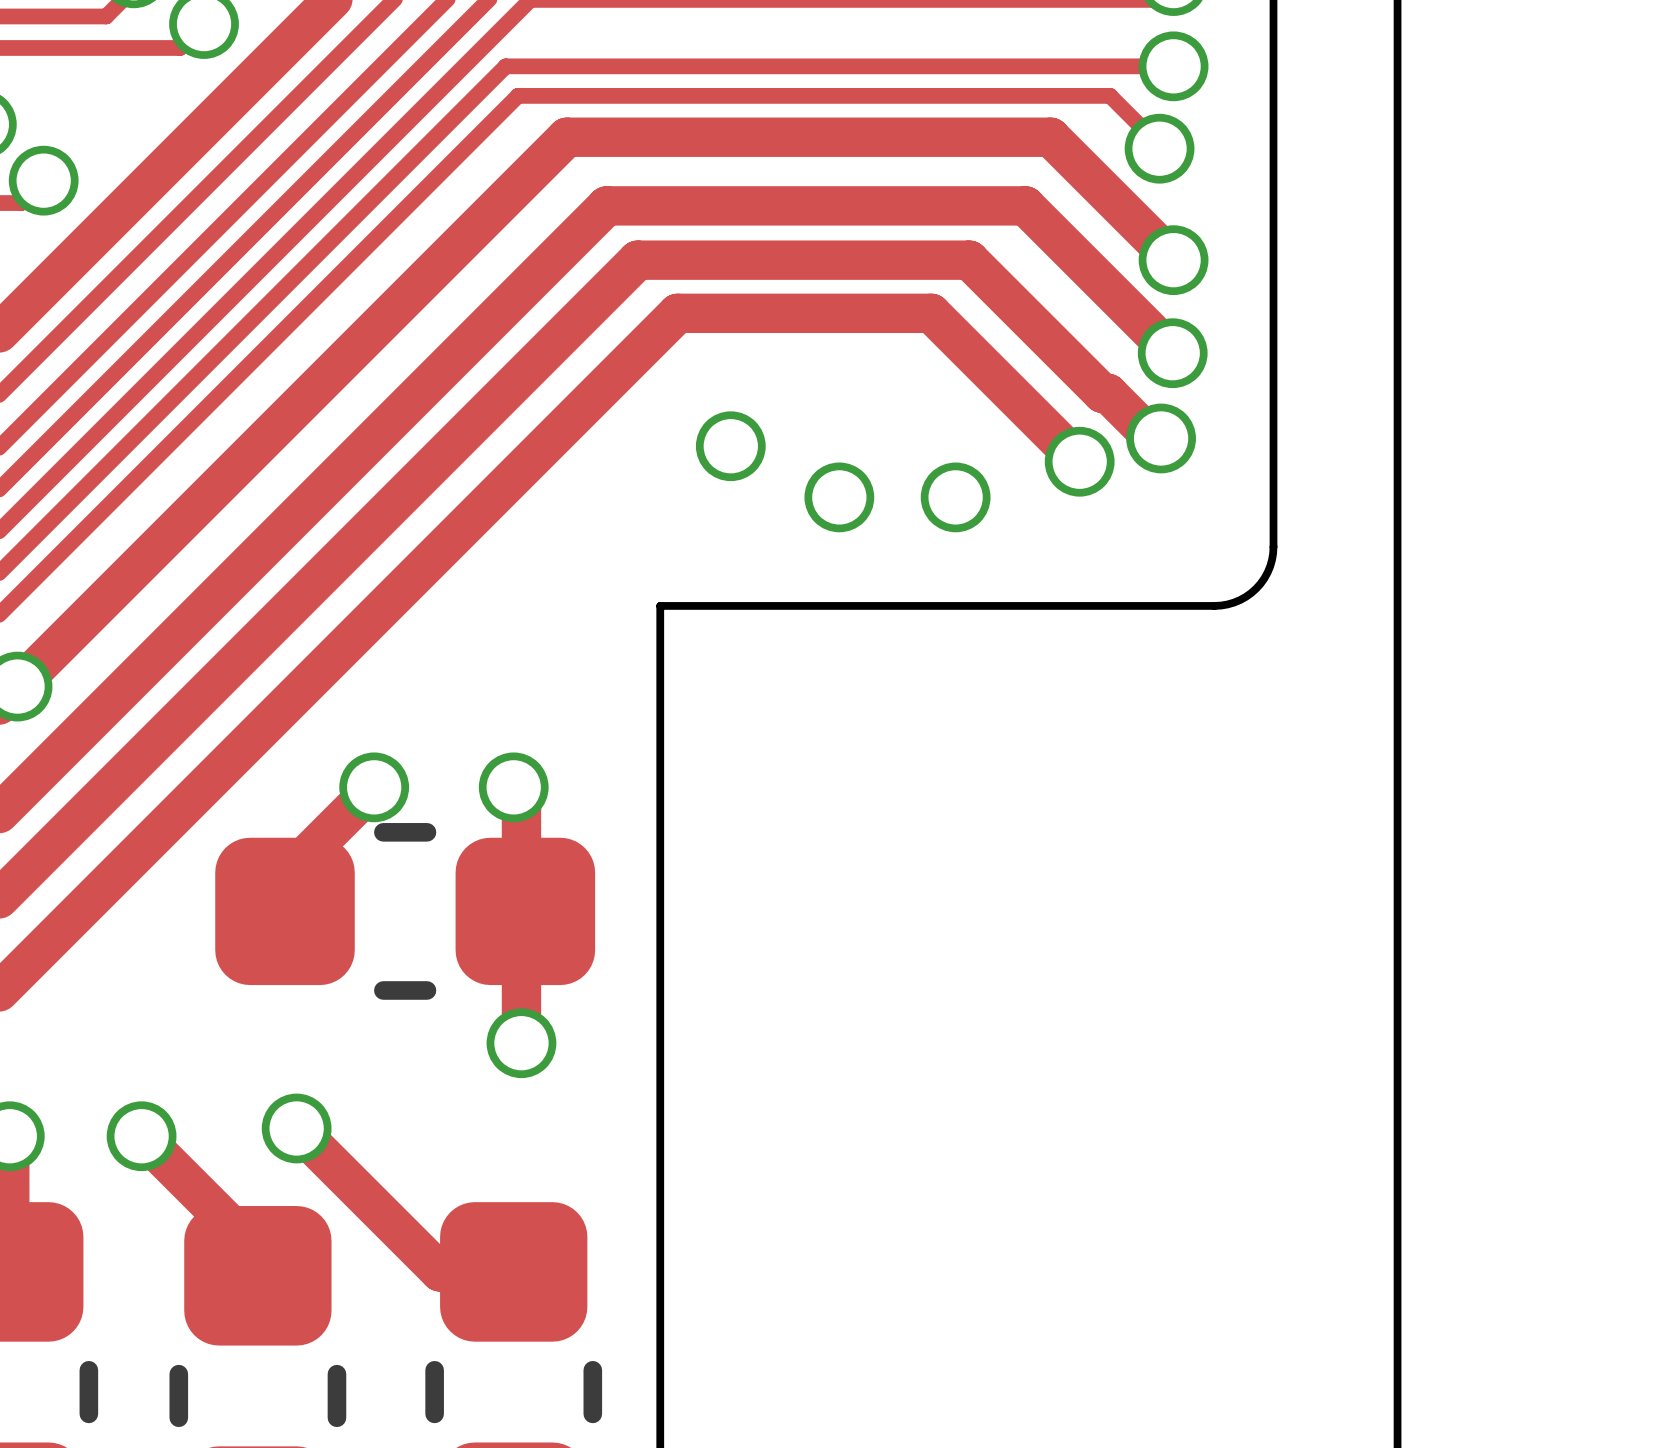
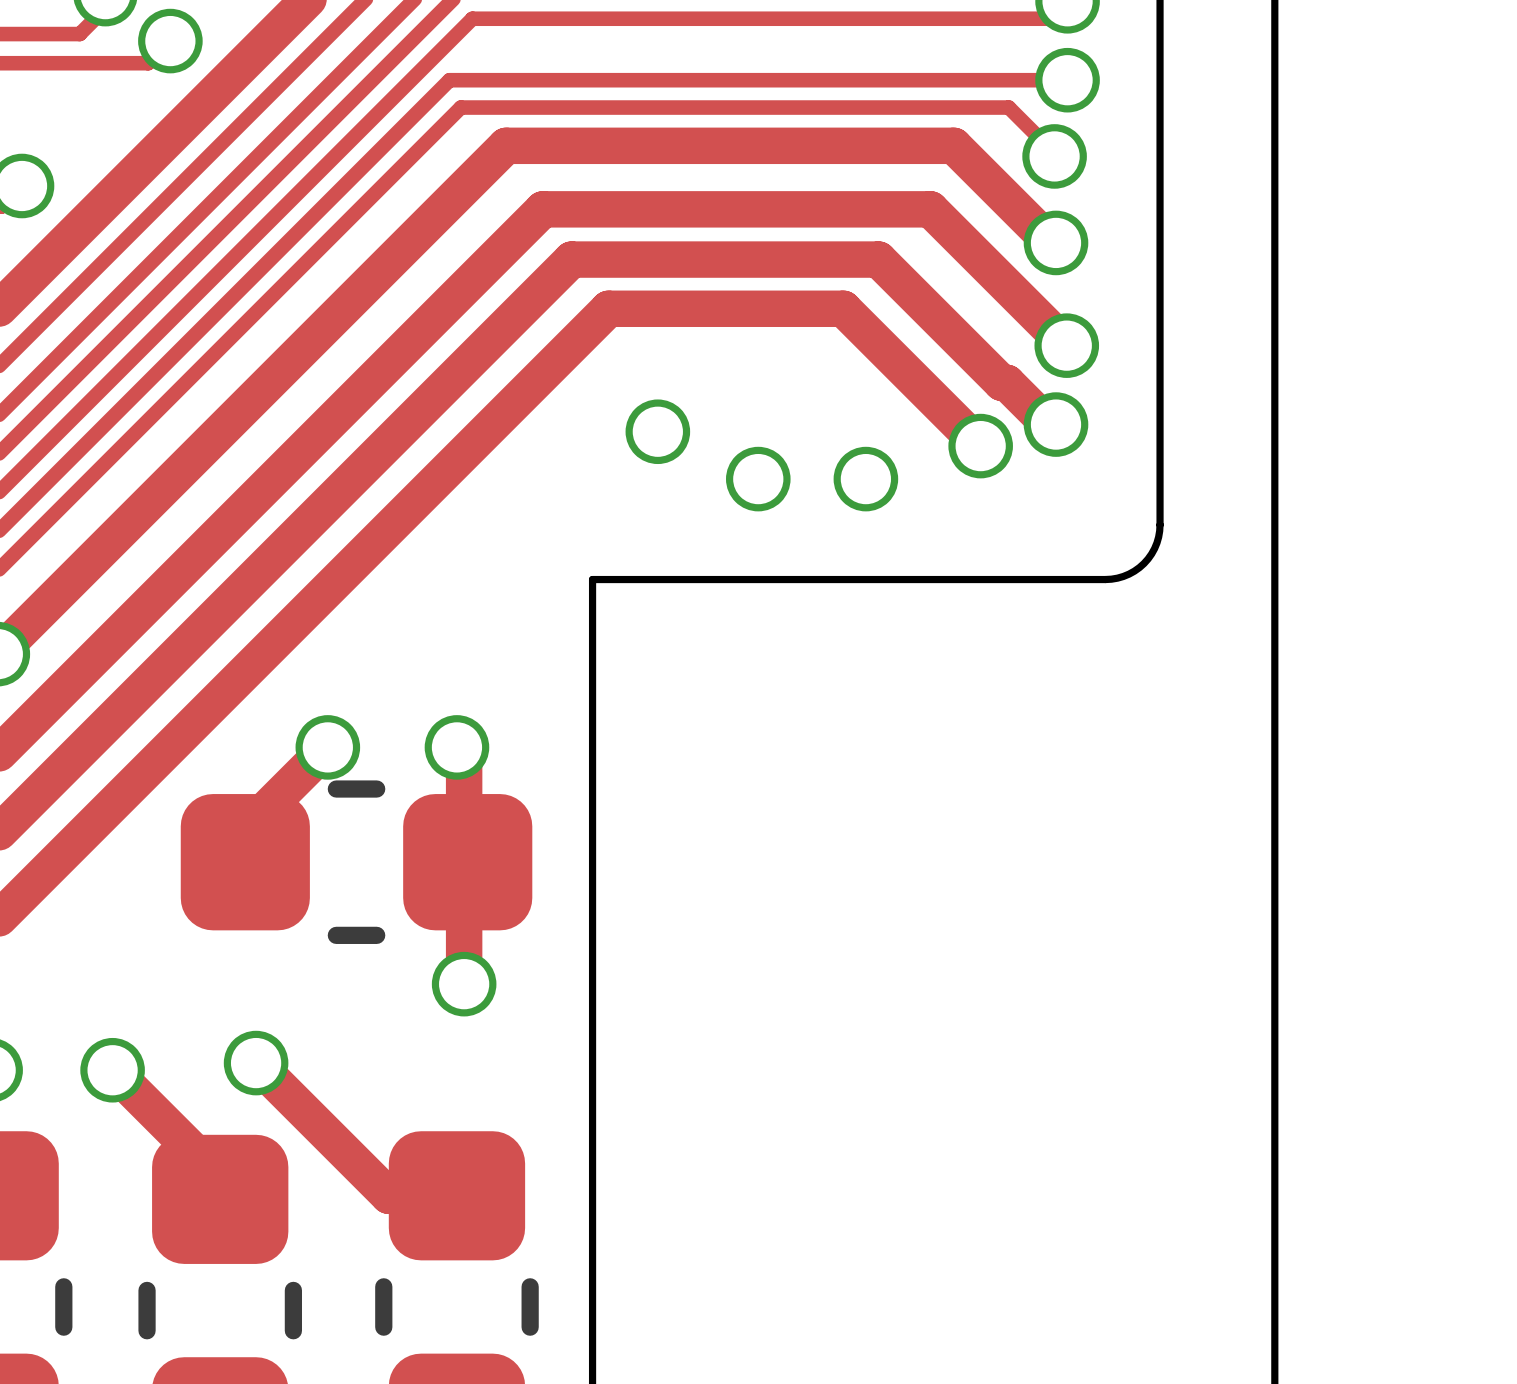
via position: (1173, 260) -> (1056, 242)

